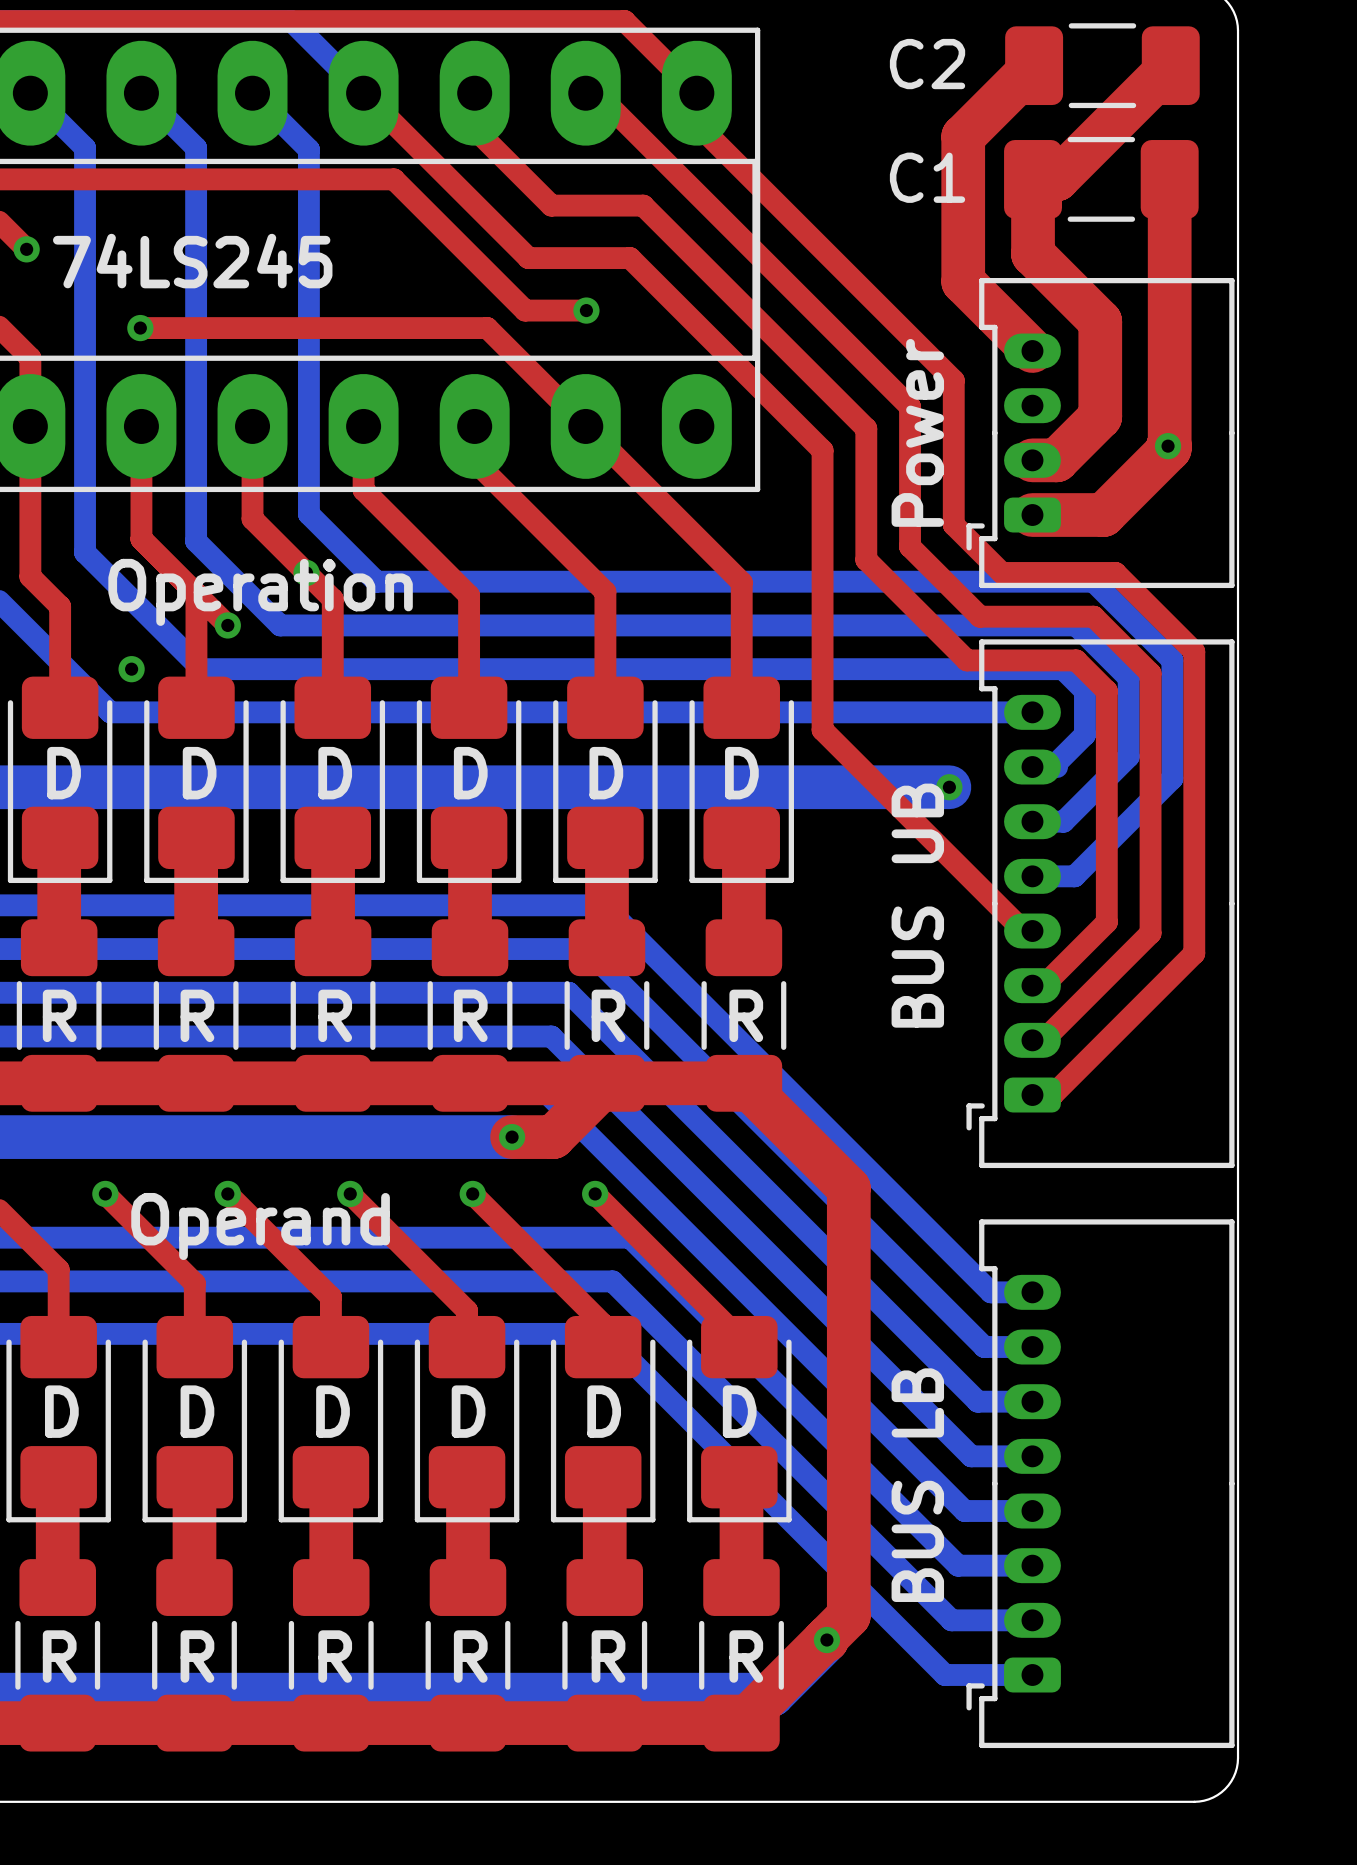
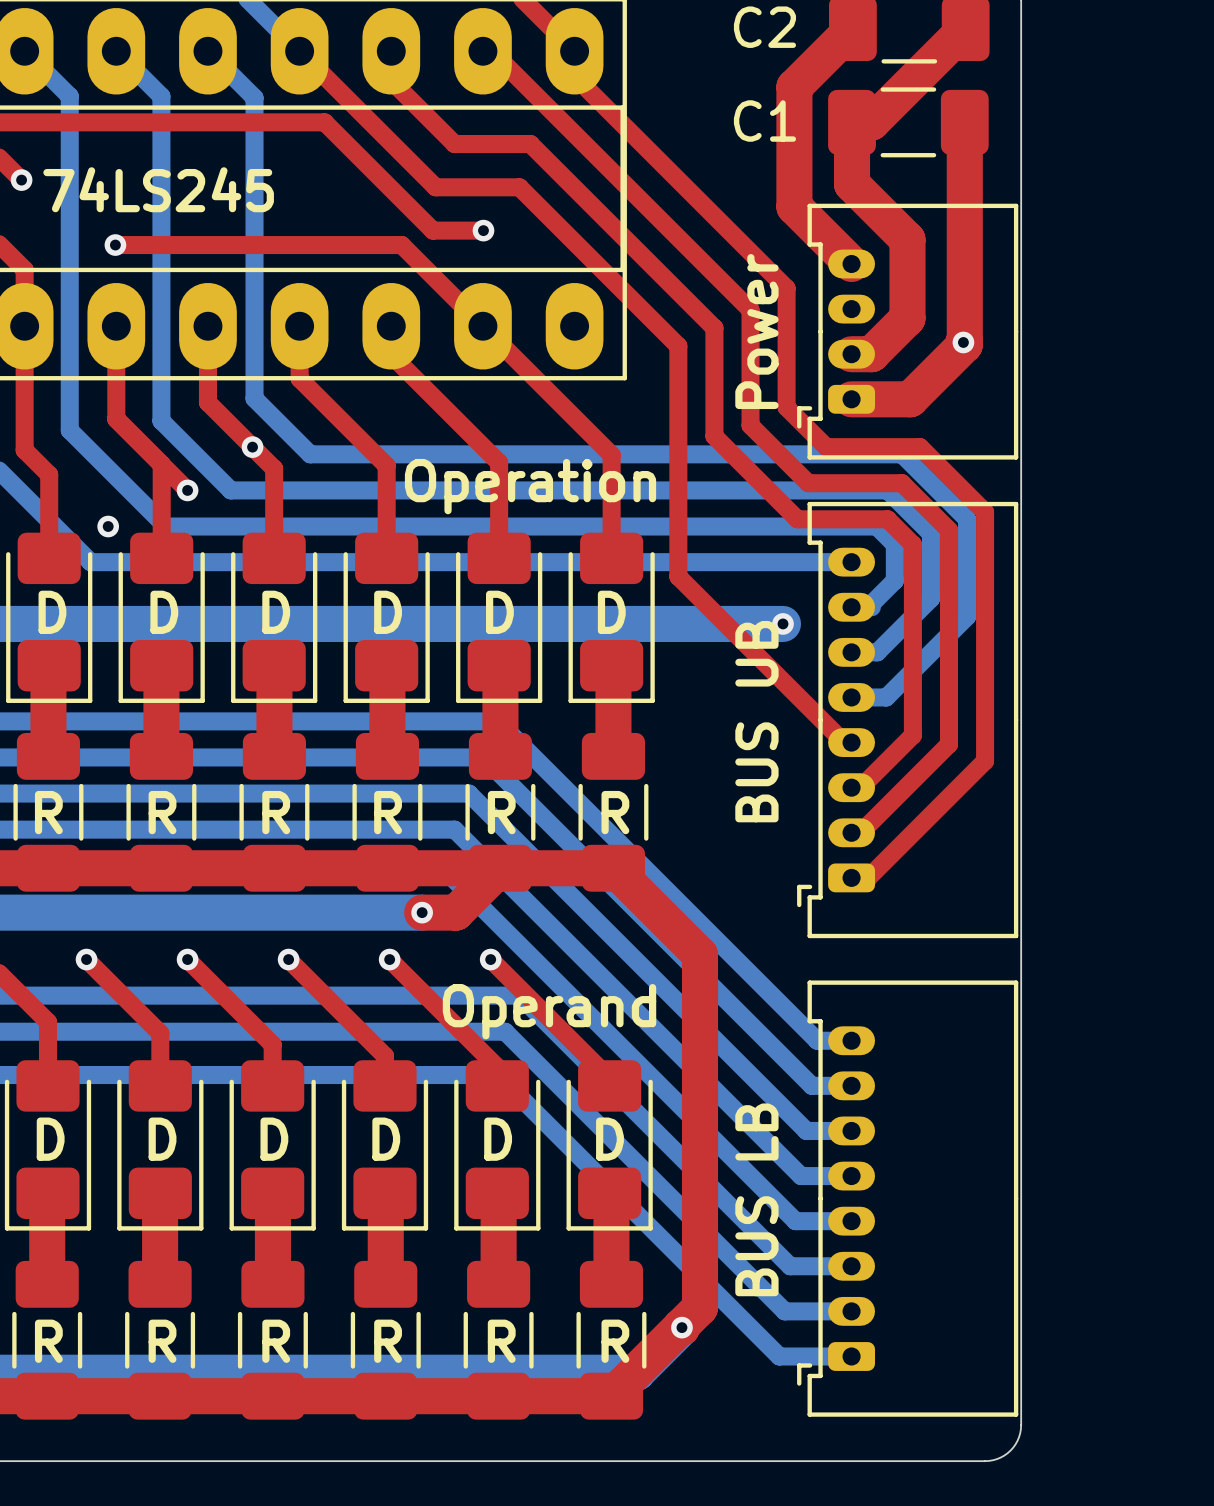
text position: Operation (260, 592) -> Operation (530, 486)
text position: Operand (260, 1226) -> Operand (549, 1011)

